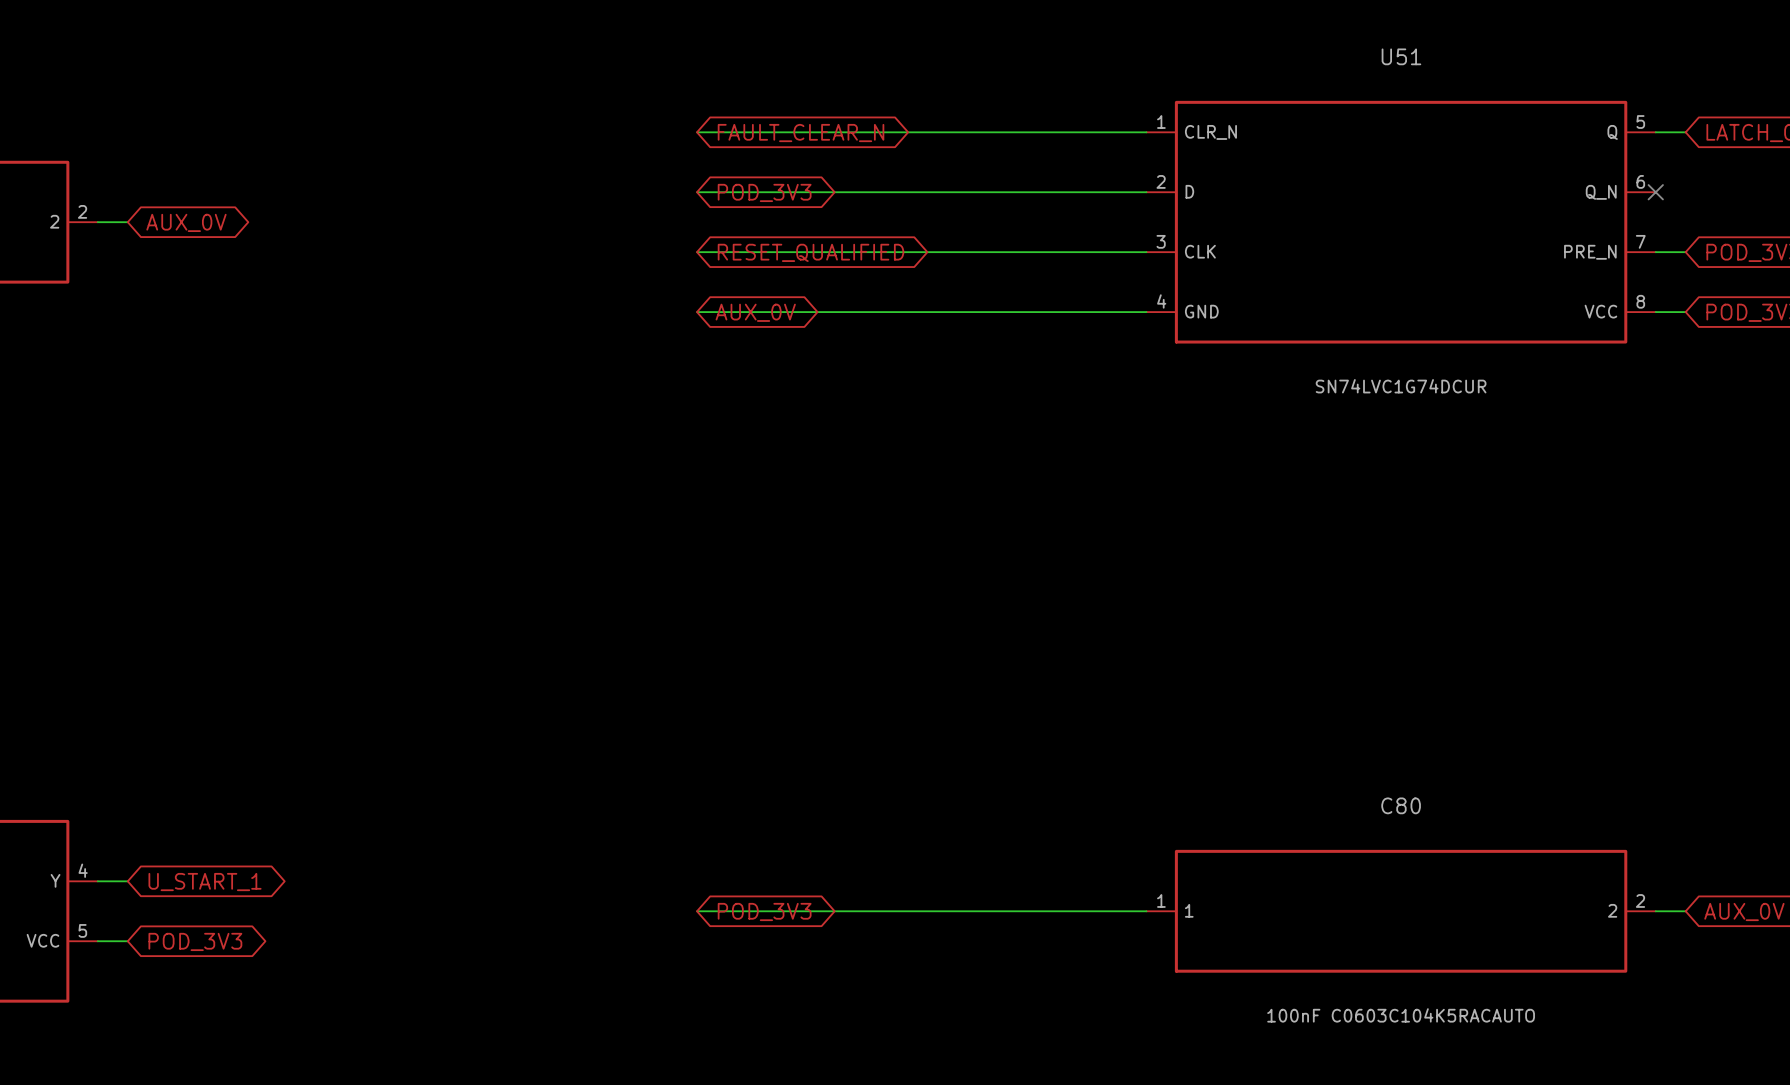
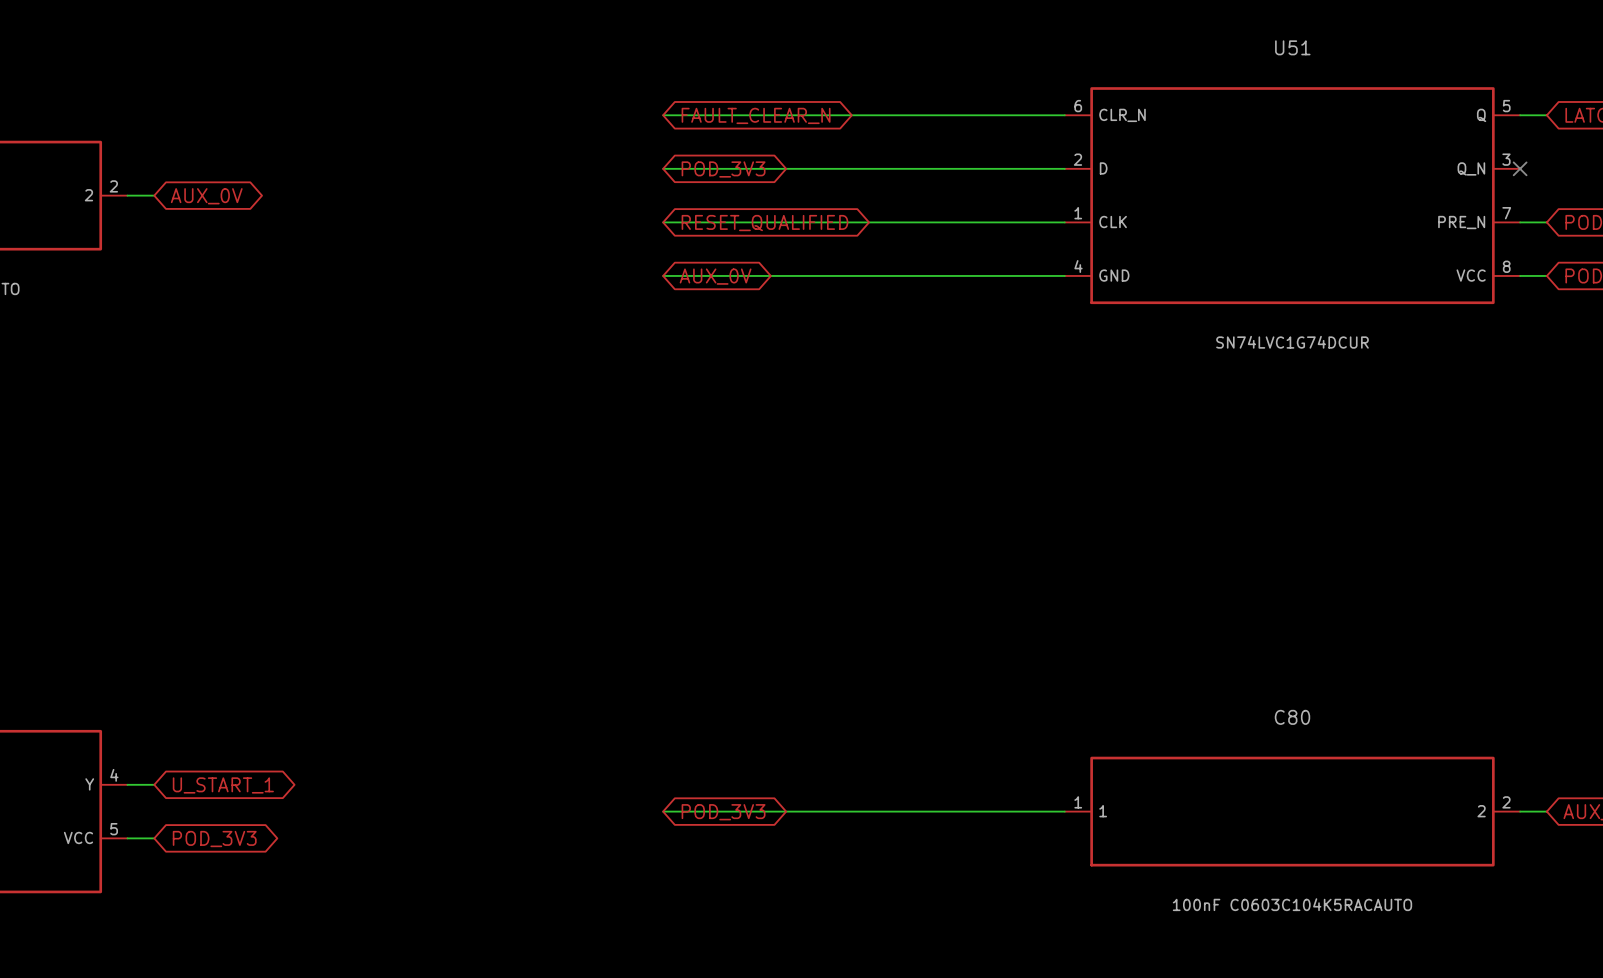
U51 pin number: 1 (1161, 122) -> 6 (1078, 106)
U51 pin number: 6 (1640, 181) -> 3 (1506, 159)
U51 pin number: 3 (1161, 241) -> 1 (1078, 213)

